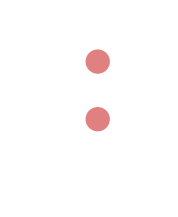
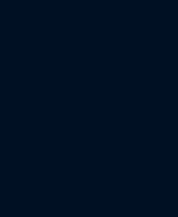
part: (97, 61) -> none
part: (97, 119) -> none

